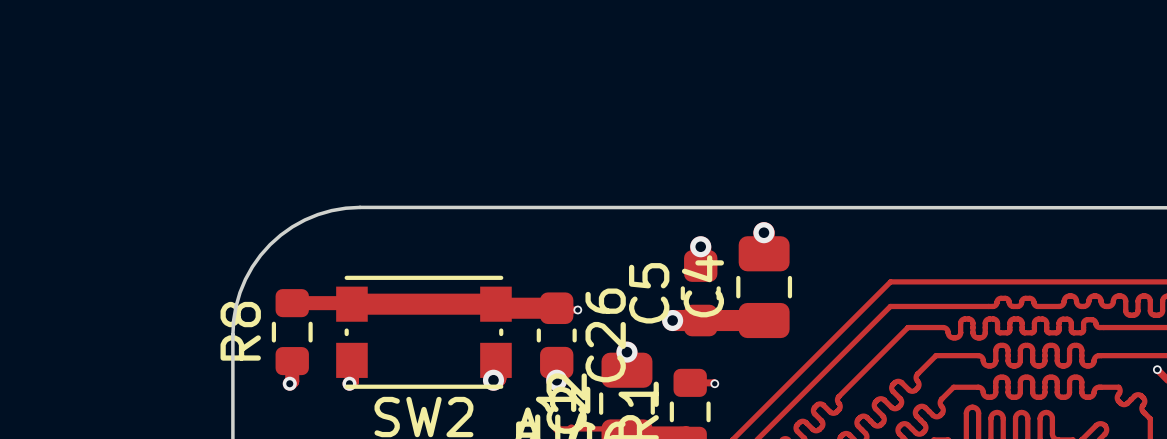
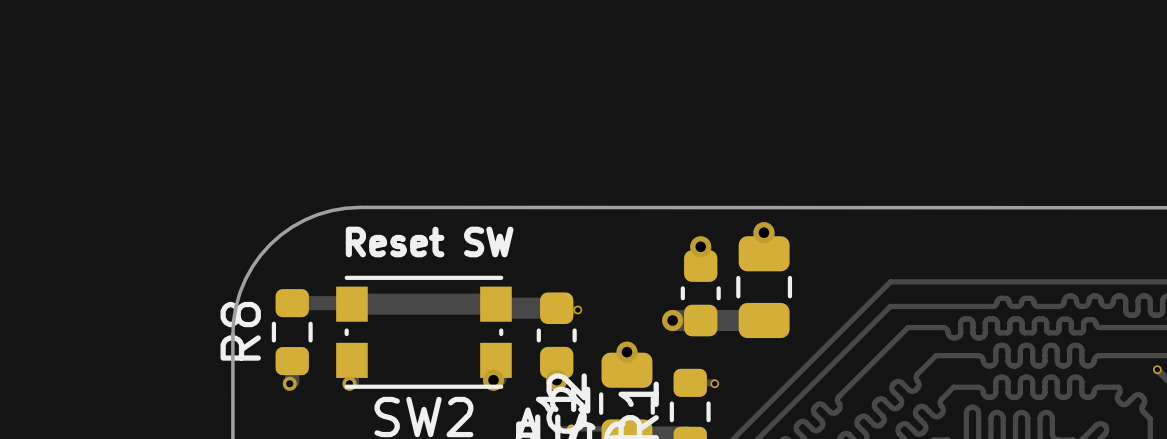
text: none -> Reset SW (429, 241)
C4 name: C4 (702, 286) -> none
C5 name: C5 (649, 293) -> none
C26 name: C26 (605, 335) -> none

